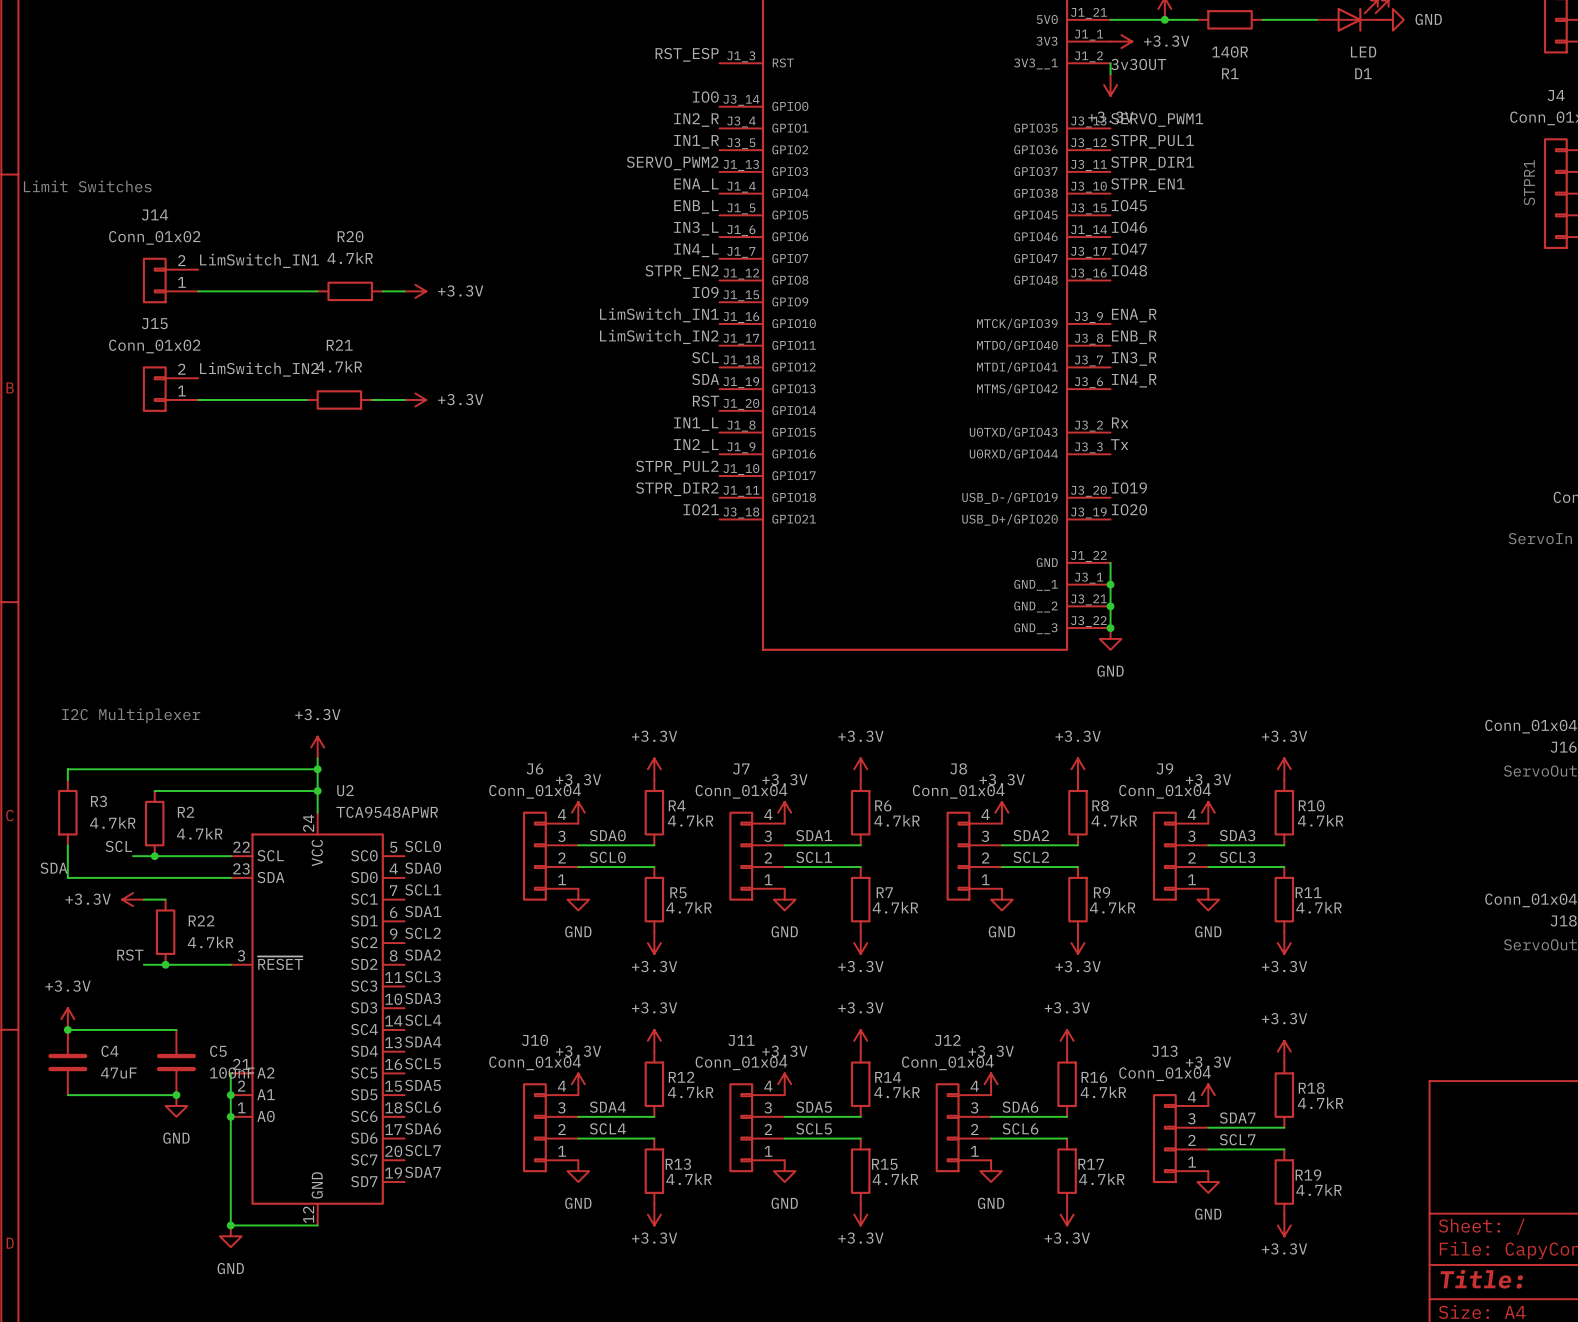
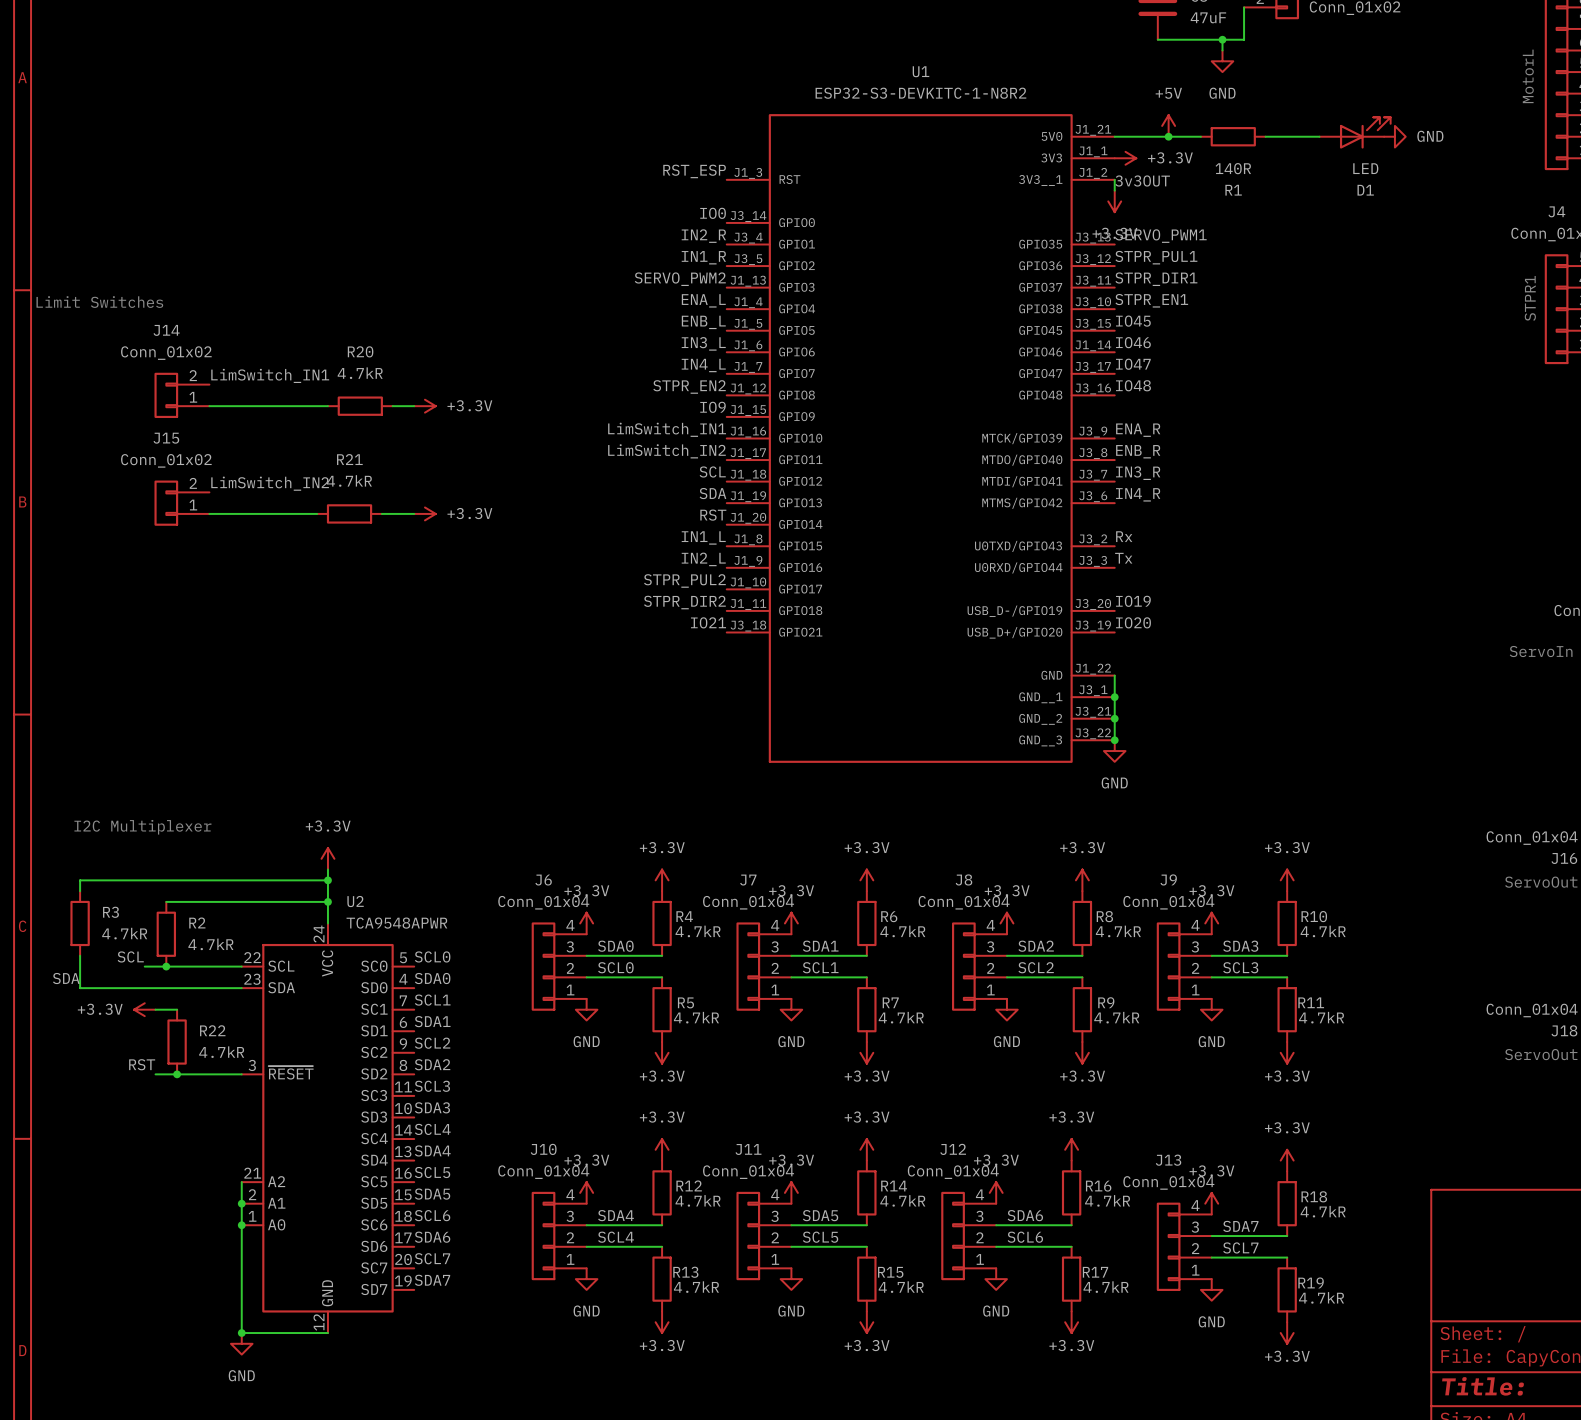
power symbol: +3.3V (67, 1019) -> none
wire: (67, 1029) (176, 1029) -> none
junction: (67, 1029) -> none
C4: 47uF (67, 1062) -> none
C5: 100nF (176, 1062) -> none
wire: (67, 1095) (176, 1095) -> none
junction: (176, 1095) -> none
power symbol: GND (176, 1105) -> none

